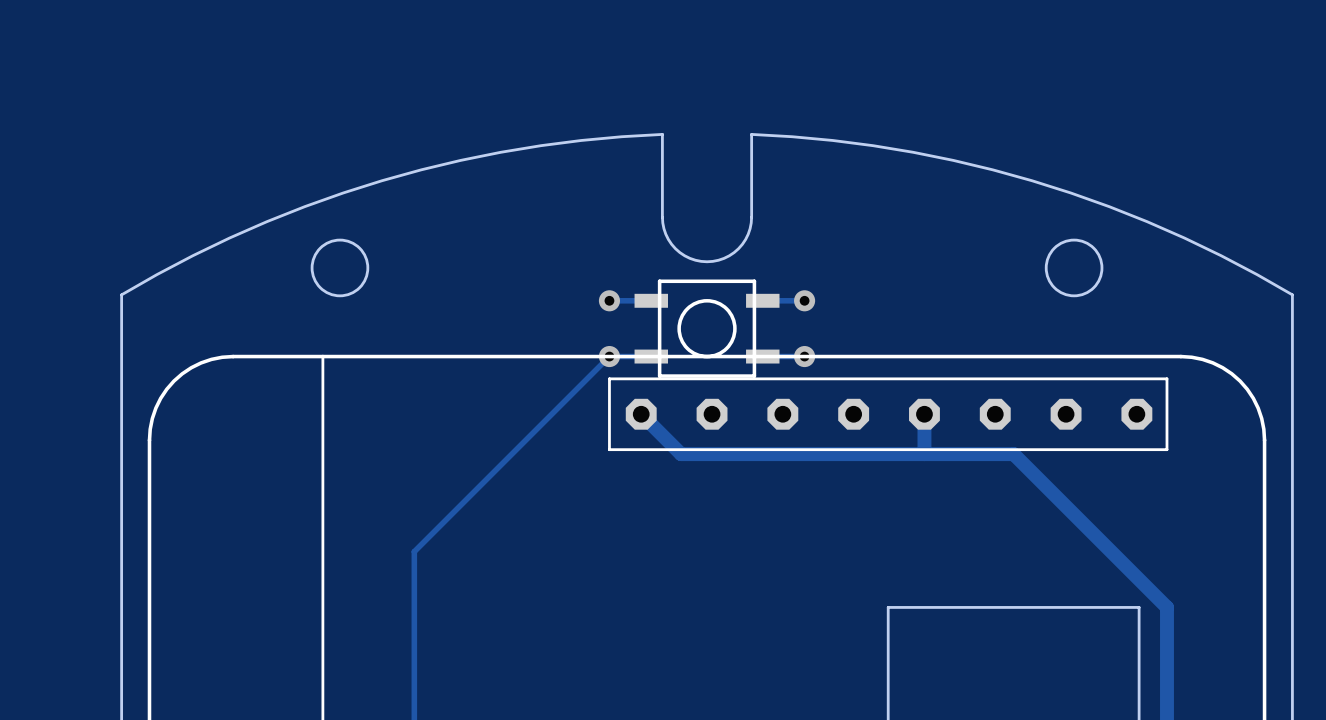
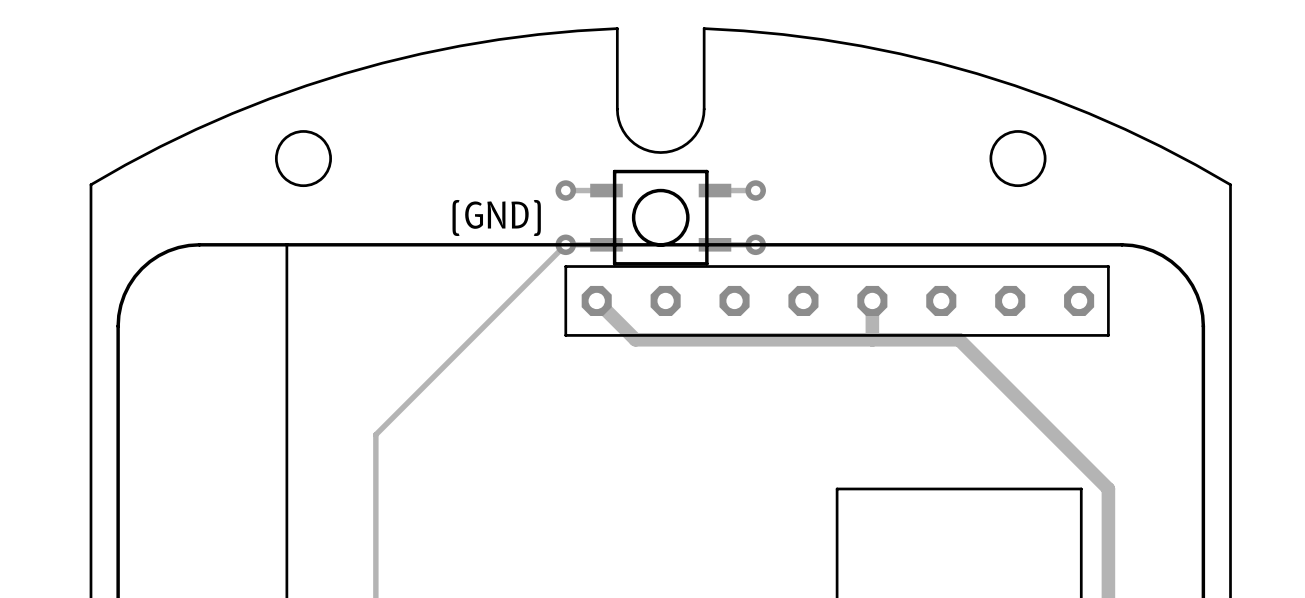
text: none -> (GND) (496, 217)

